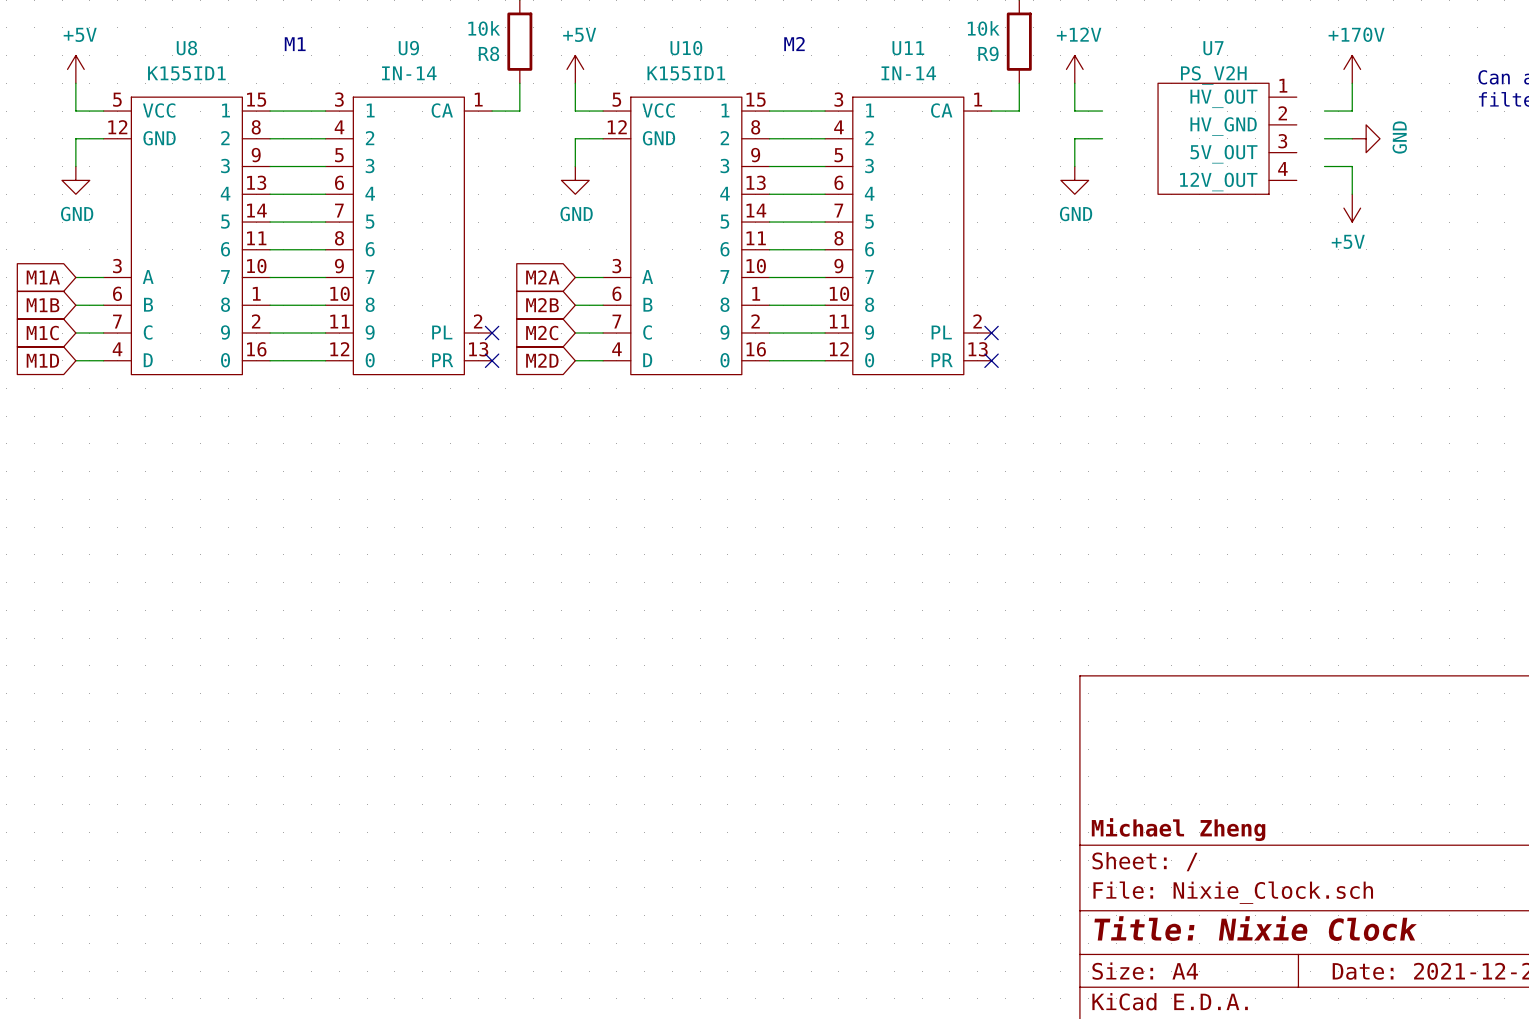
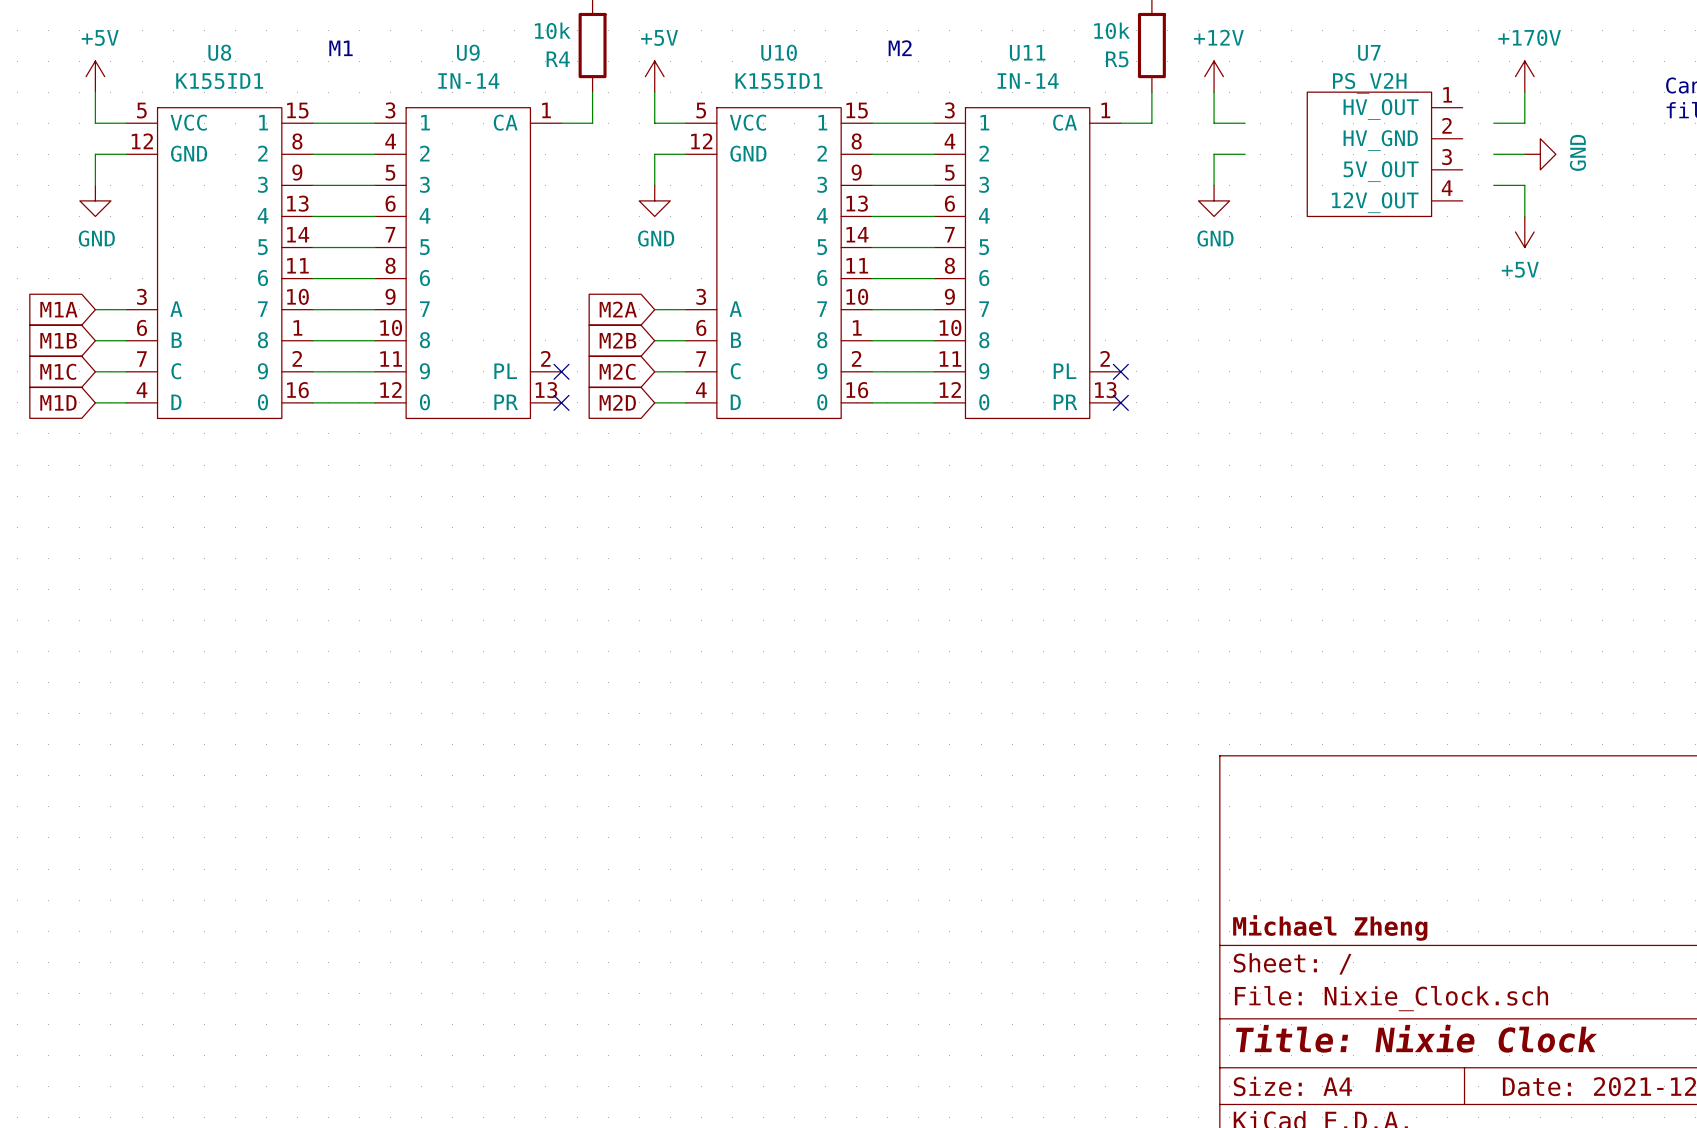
R8 name: R8 (489, 53) -> R4 (558, 59)
R9 name: R9 (988, 53) -> R5 (1117, 59)

